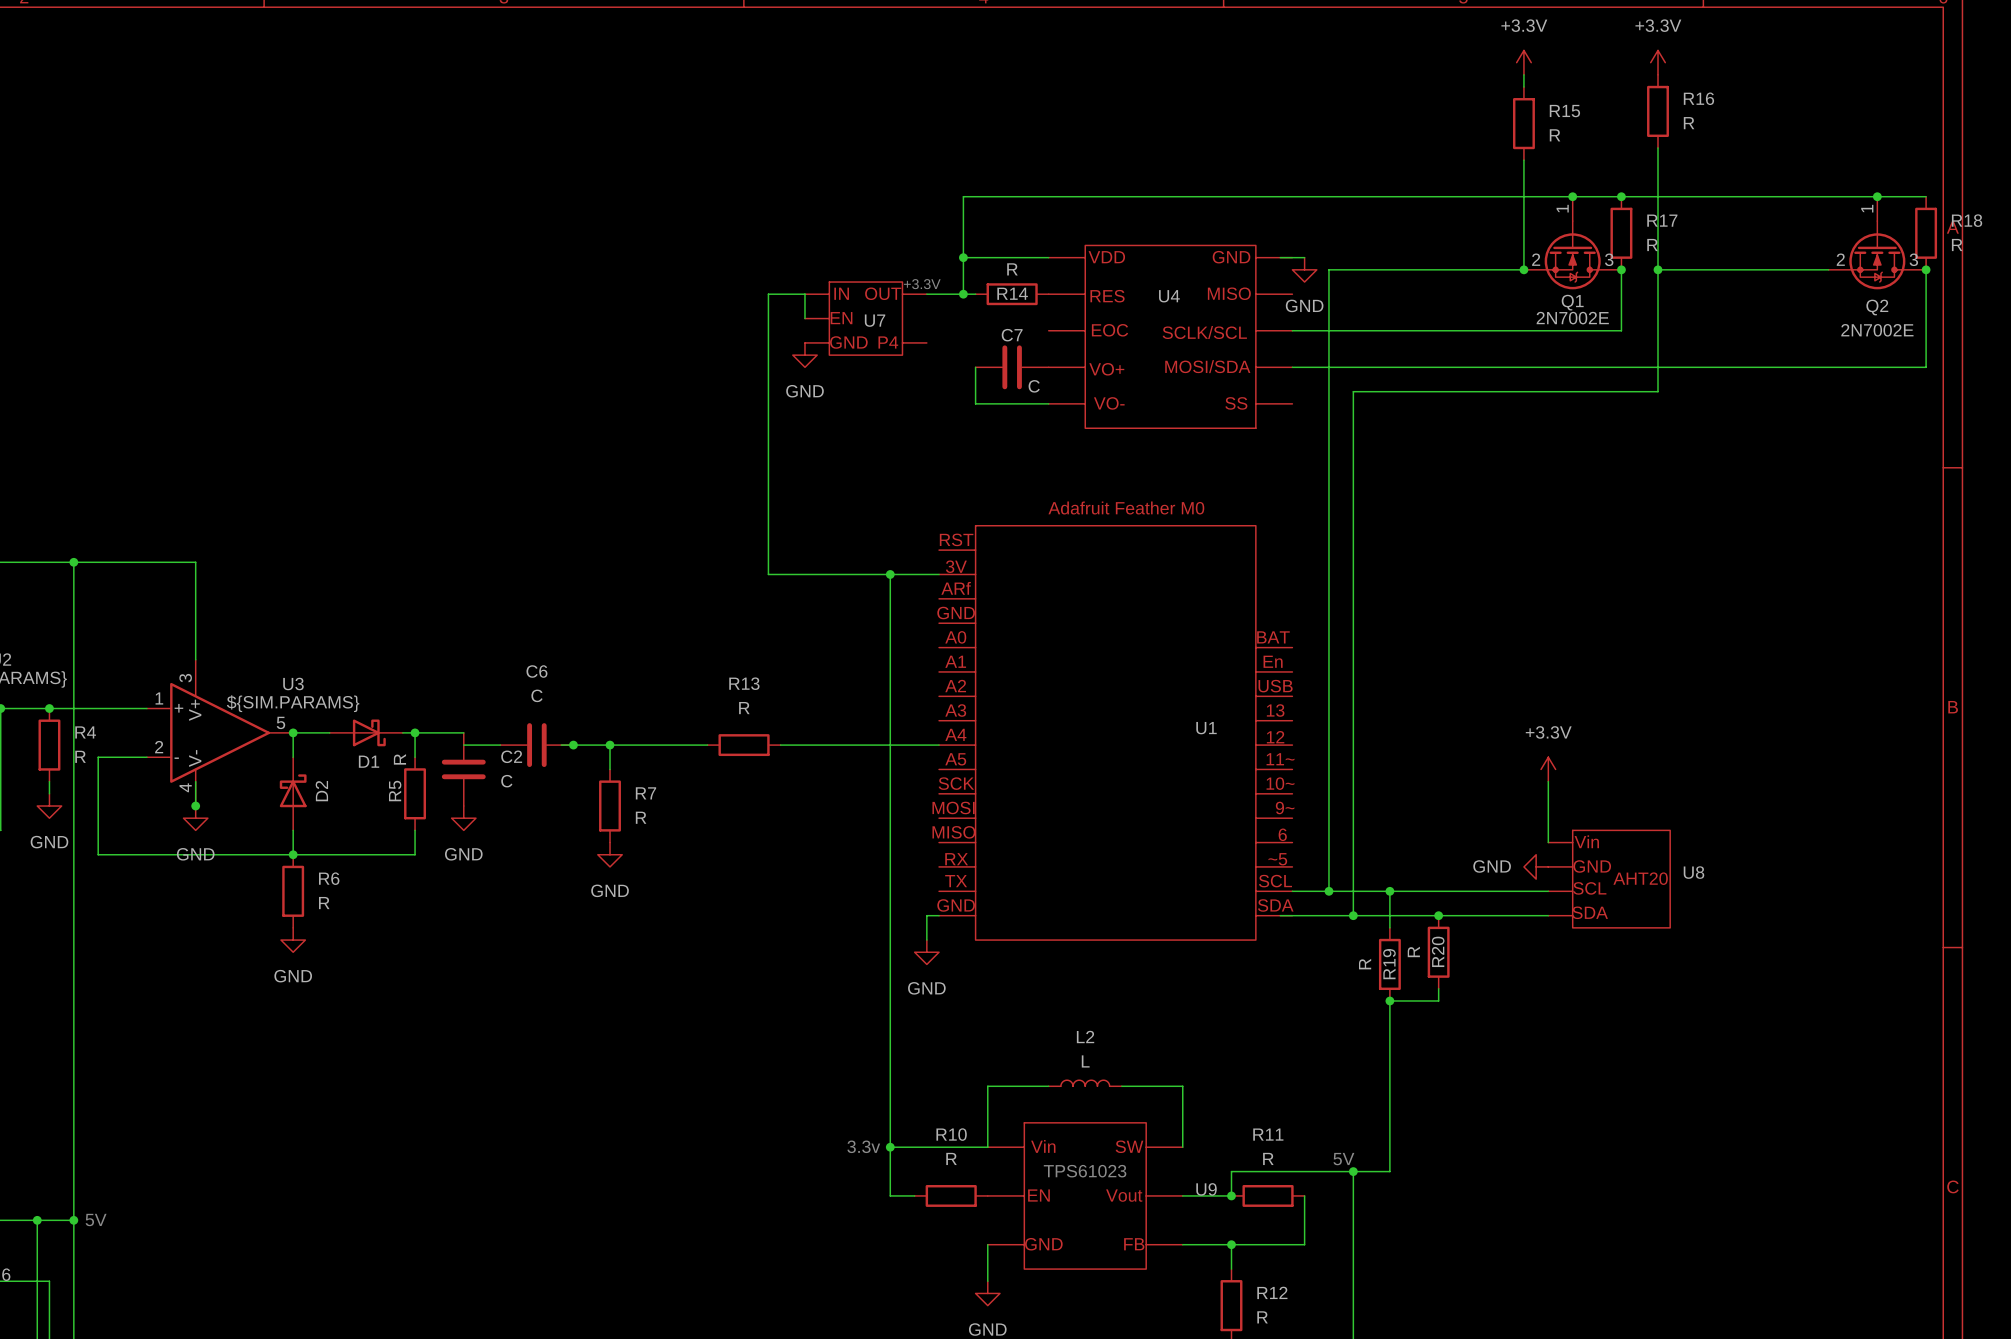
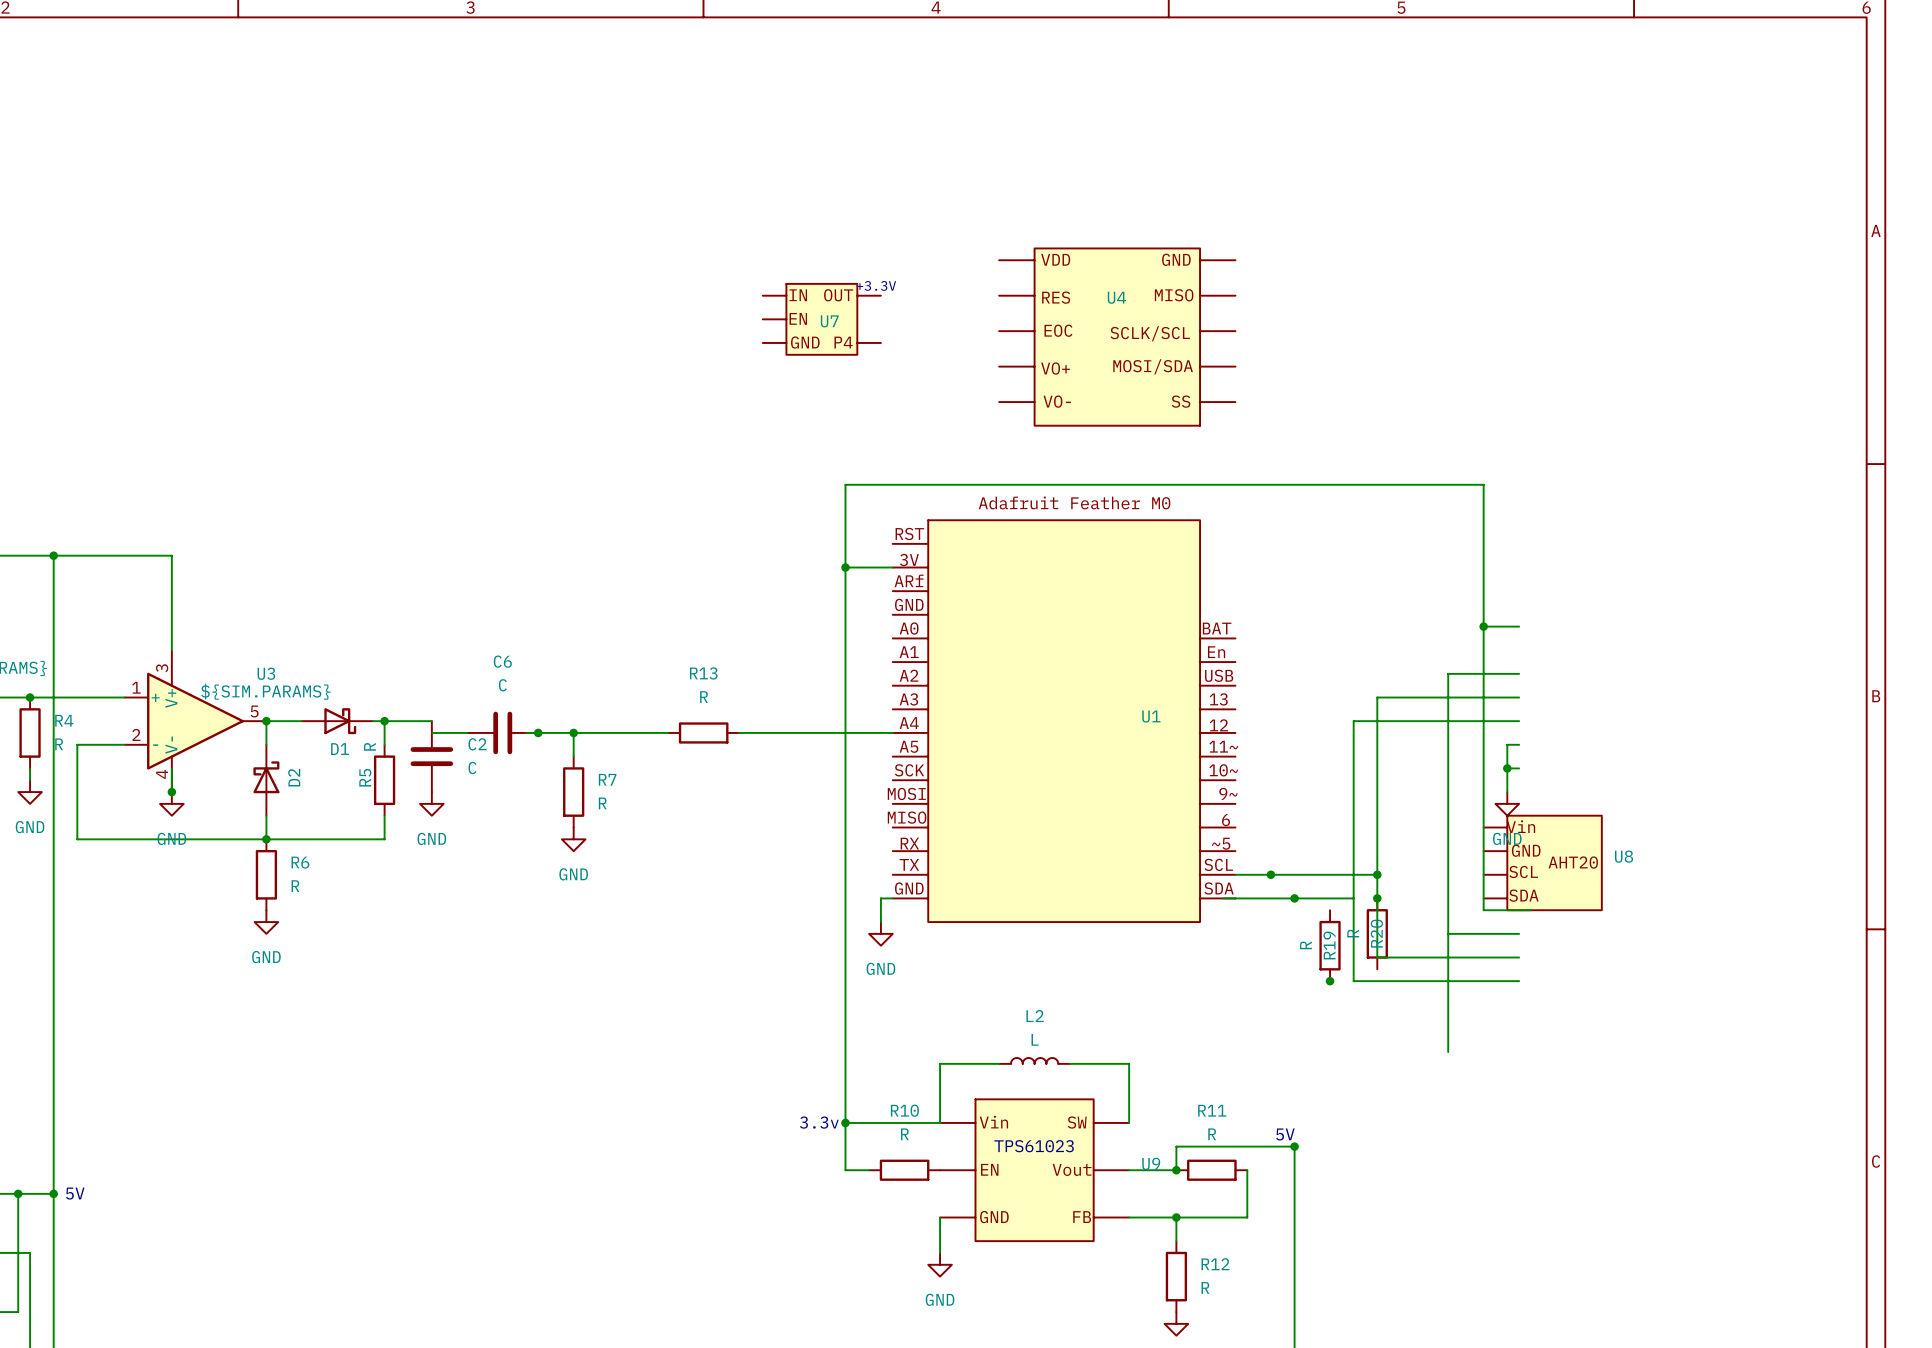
power symbol: +3.3V (1523, 62) -> none
power symbol: +3.3V (1658, 62) -> none
wire: (1523, 74) (1523, 87) -> none
R16: R (1658, 111) -> none
R15: R (1523, 123) -> none
wire: (1658, 147) (1658, 391) (1353, 391) (1353, 915) -> none
wire: (1523, 160) (1523, 269) (1328, 269) (1328, 891) -> none
junction: (1572, 196) -> none
junction: (1621, 196) -> none
junction: (1877, 196) -> none
wire: (1926, 196) (963, 196) (963, 294) -> none
R17: R (1621, 233) -> none
R18: R (1926, 233) -> none
Q1: 2N7002E (1572, 243) -> none
Q2: 2N7002E (1877, 243) -> none
wire: (963, 257) (1048, 257) -> none
junction: (963, 257) -> none
wire: (1280, 257) (1304, 257) -> none
power symbol: GND (1304, 269) -> none
junction: (1523, 269) -> none
wire: (1621, 269) (1621, 330) (1292, 330) -> none
junction: (1621, 269) -> none
wire: (1658, 269) (1828, 269) -> none
junction: (1658, 269) -> none
wire: (1926, 269) (1926, 367) (1292, 367) -> none
junction: (1926, 269) -> none
wire: (926, 294) (975, 294) -> none
junction: (963, 294) -> none
R14: R (1012, 294) -> none
wire: (804, 318) (804, 294) (768, 294) (768, 574) (890, 574) -> (1483, 768) (1483, 484) (845, 484) (845, 567)
power symbol: GND (804, 355) -> none
wire: (975, 367) (975, 403) (1048, 403) -> none
C7: C (1012, 367) -> none
wire: none -> (1483, 626) (1519, 626)
junction: none -> (1483, 626)
wire: none -> (1519, 673) (1448, 673) (1448, 1052)
wire: none -> (1519, 697) (1377, 697) (1377, 957) (1519, 957)
wire: none -> (1519, 744) (1507, 744) (1507, 792)
power symbol: +3.3V (1548, 769) -> none
wire: none -> (1507, 768) (1519, 768)
junction: none -> (1507, 768)
wire: none -> (1483, 827) (1483, 910) (1530, 910)
power symbol rotation: 0° (1536, 866) -> 90° counterclockwise (1507, 803)
power symbol position: GND (1536, 866) -> GND (1507, 803)
wire: (1389, 891) (1389, 927) -> none
junction position: (1389, 891) -> (1377, 874)
wire: (1438, 891) (1548, 891) -> none
wire: (1414, 915) (1548, 915) -> none
wire: none -> (1448, 933) (1519, 933)
wire: (1438, 988) (1438, 1000) -> (1519, 981) (1377, 981)
wire: (1414, 1000) (1389, 1000) (1389, 1171) (1353, 1171) -> (1353, 981) (1353, 721) (1519, 721)

